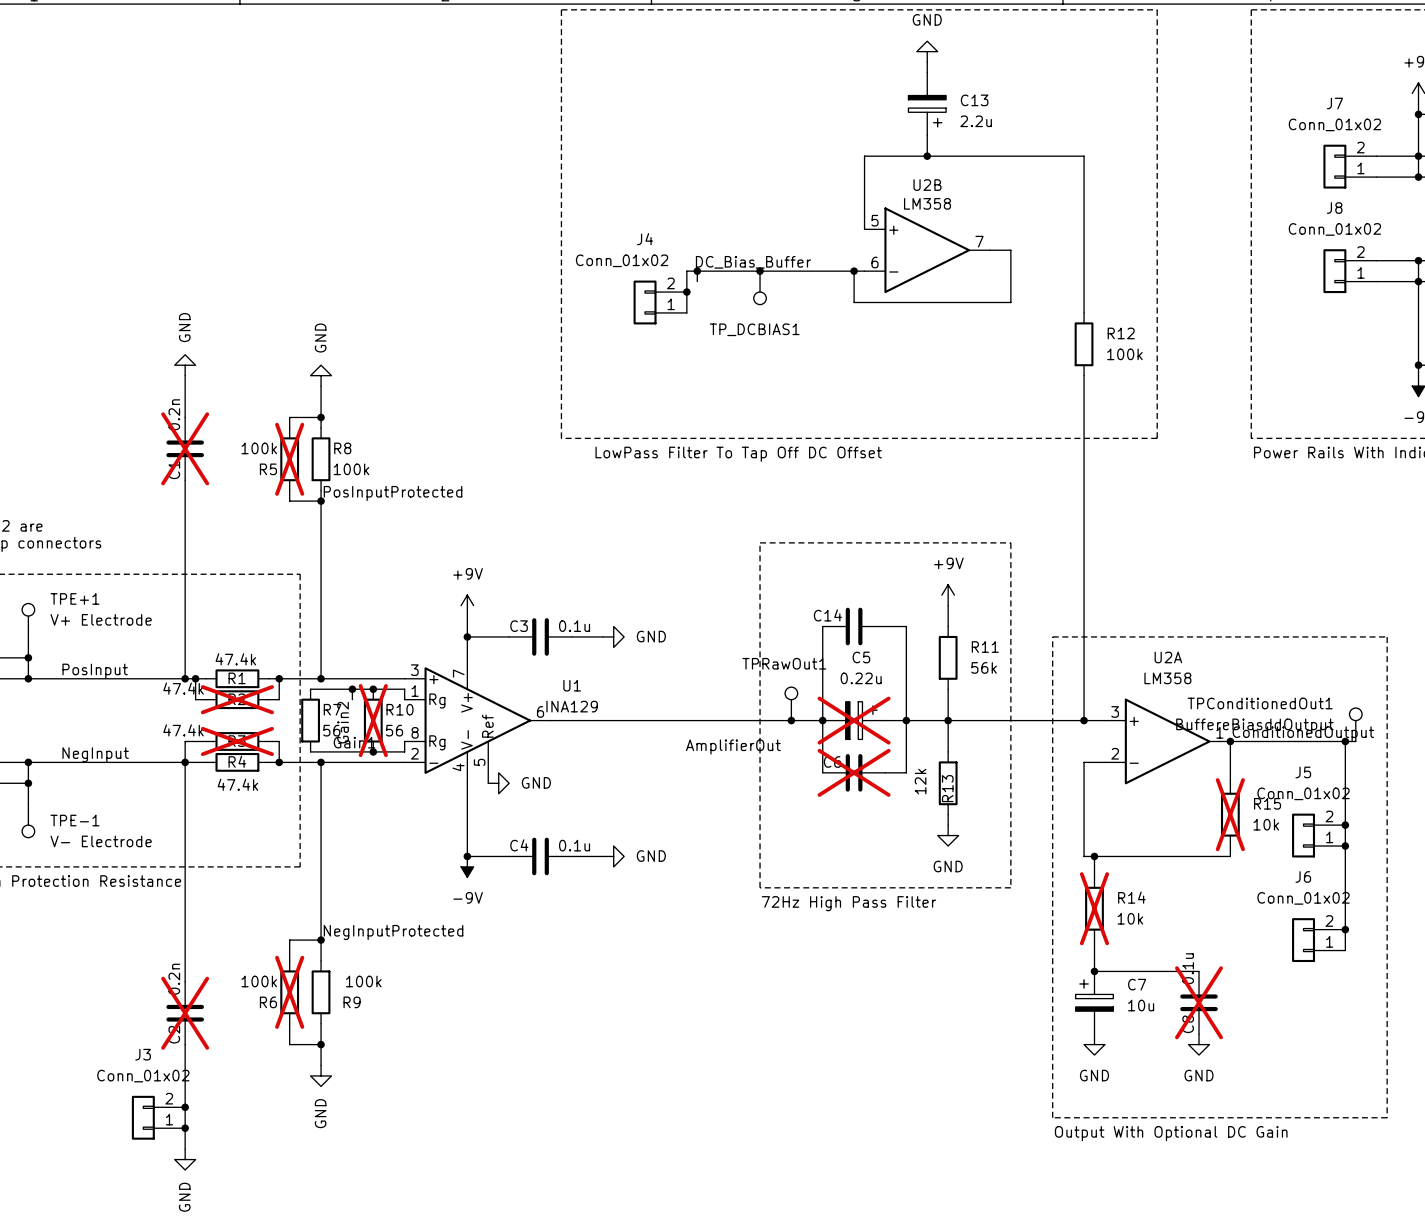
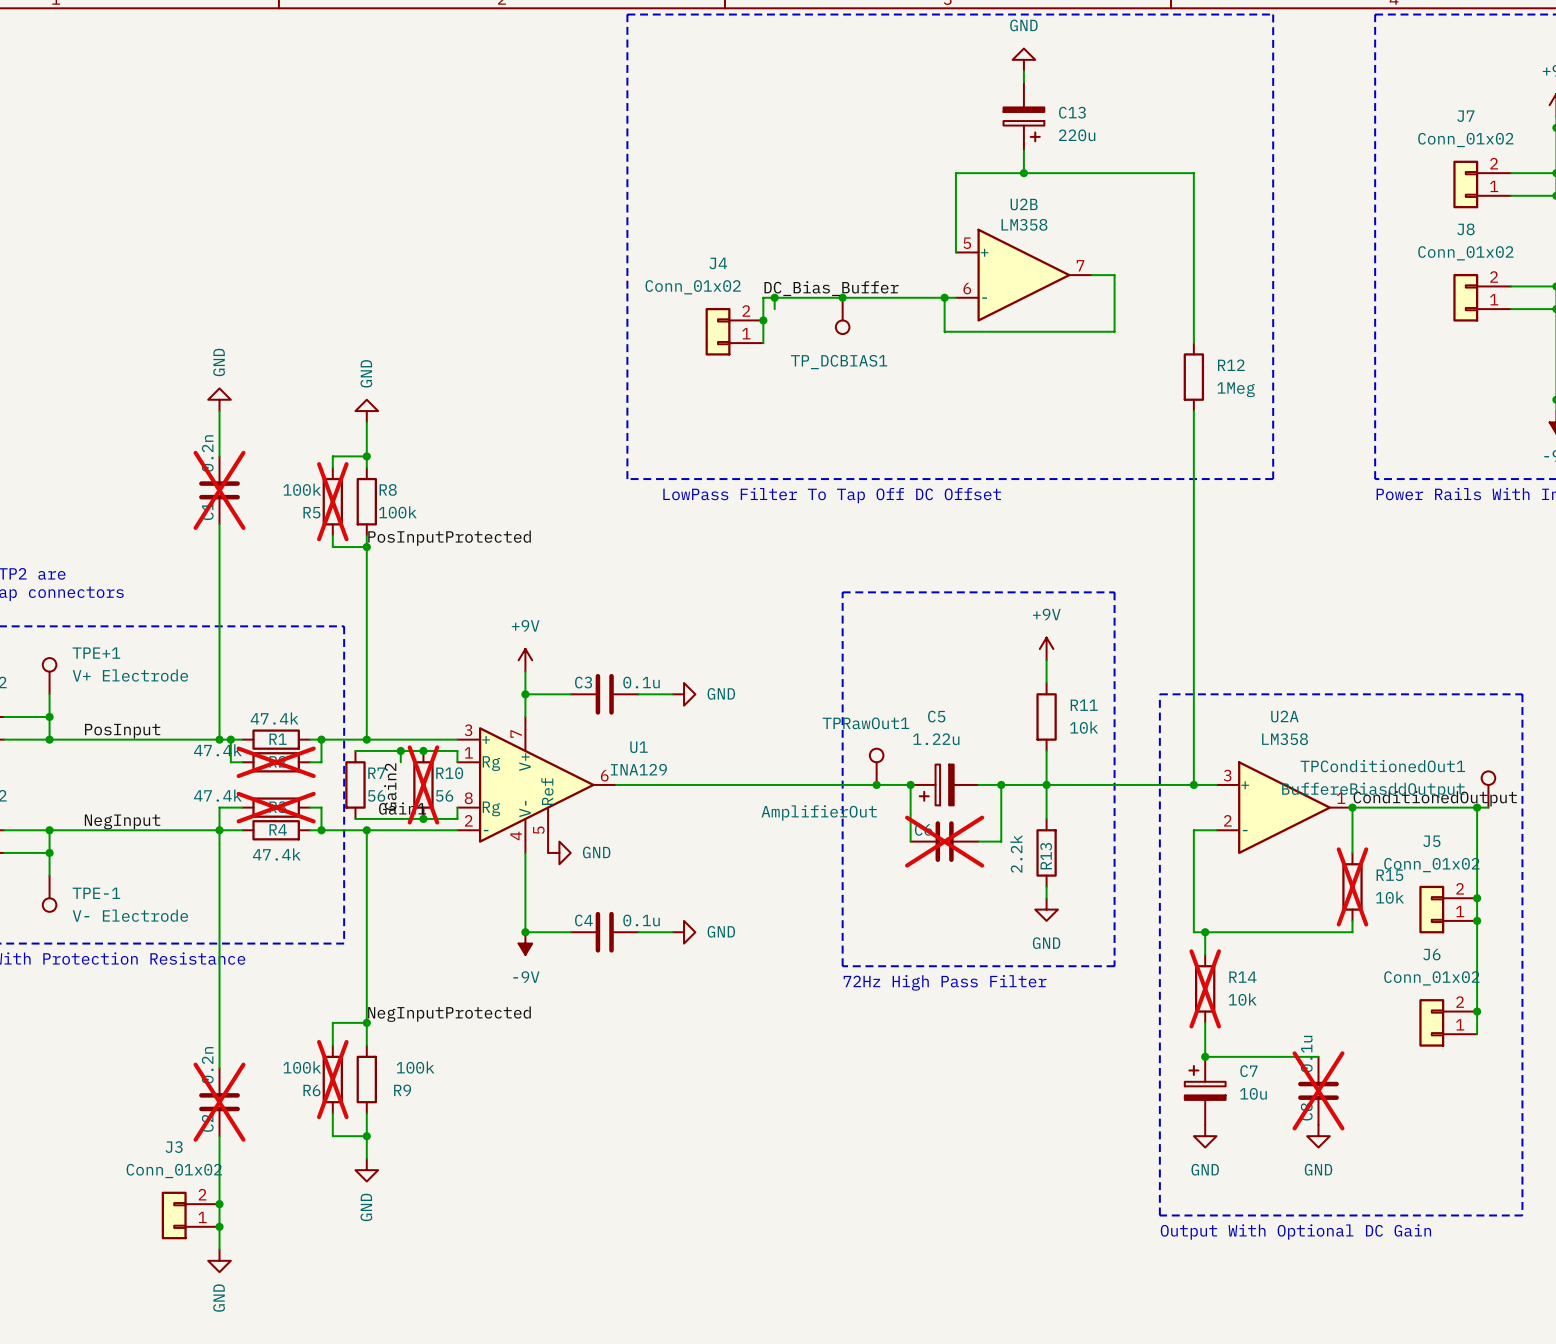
C13 value: 2.2u (976, 121) -> 220u (1077, 135)
R12 value: 100k (1124, 354) -> 1Meg (1236, 389)
wire: (822, 626) (822, 720) -> none
C14: (854, 626) -> none
wire: (885, 626) (906, 626) (906, 720) -> none
R11 value: 56k (984, 667) -> 10k (1084, 727)
C5 value: 0.22u (861, 678) -> 1.22u (936, 739)
C5 do-not-place cross: (854, 720) -> none
C5 rotation: 0° (861, 720) -> 180° (936, 784)
R13 value: 12k (920, 781) -> 2.2k (1016, 853)

